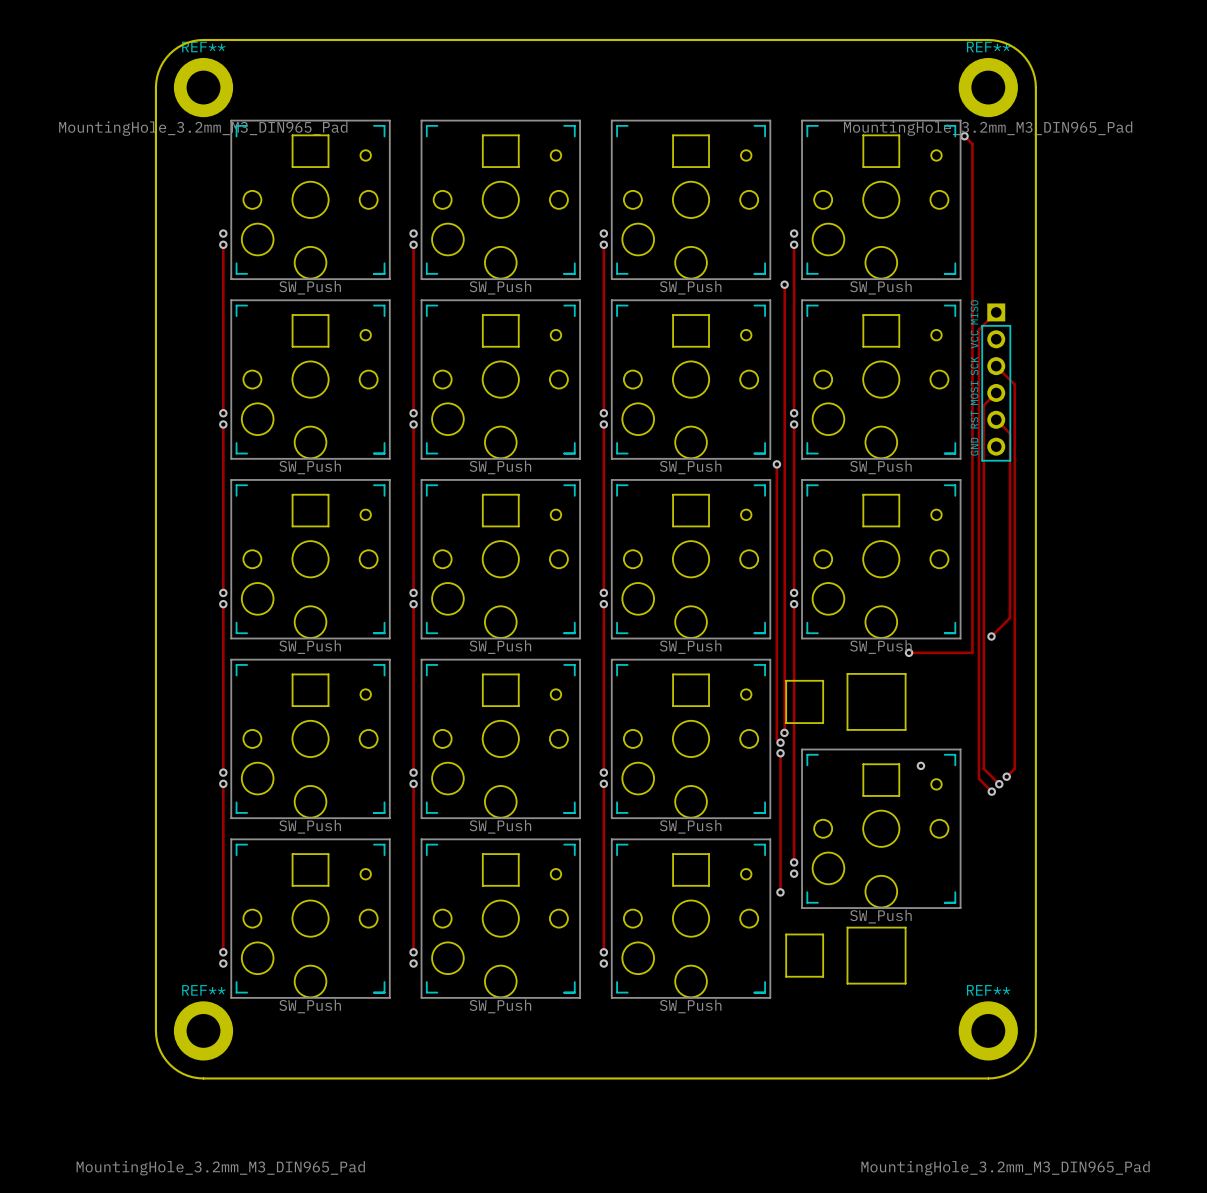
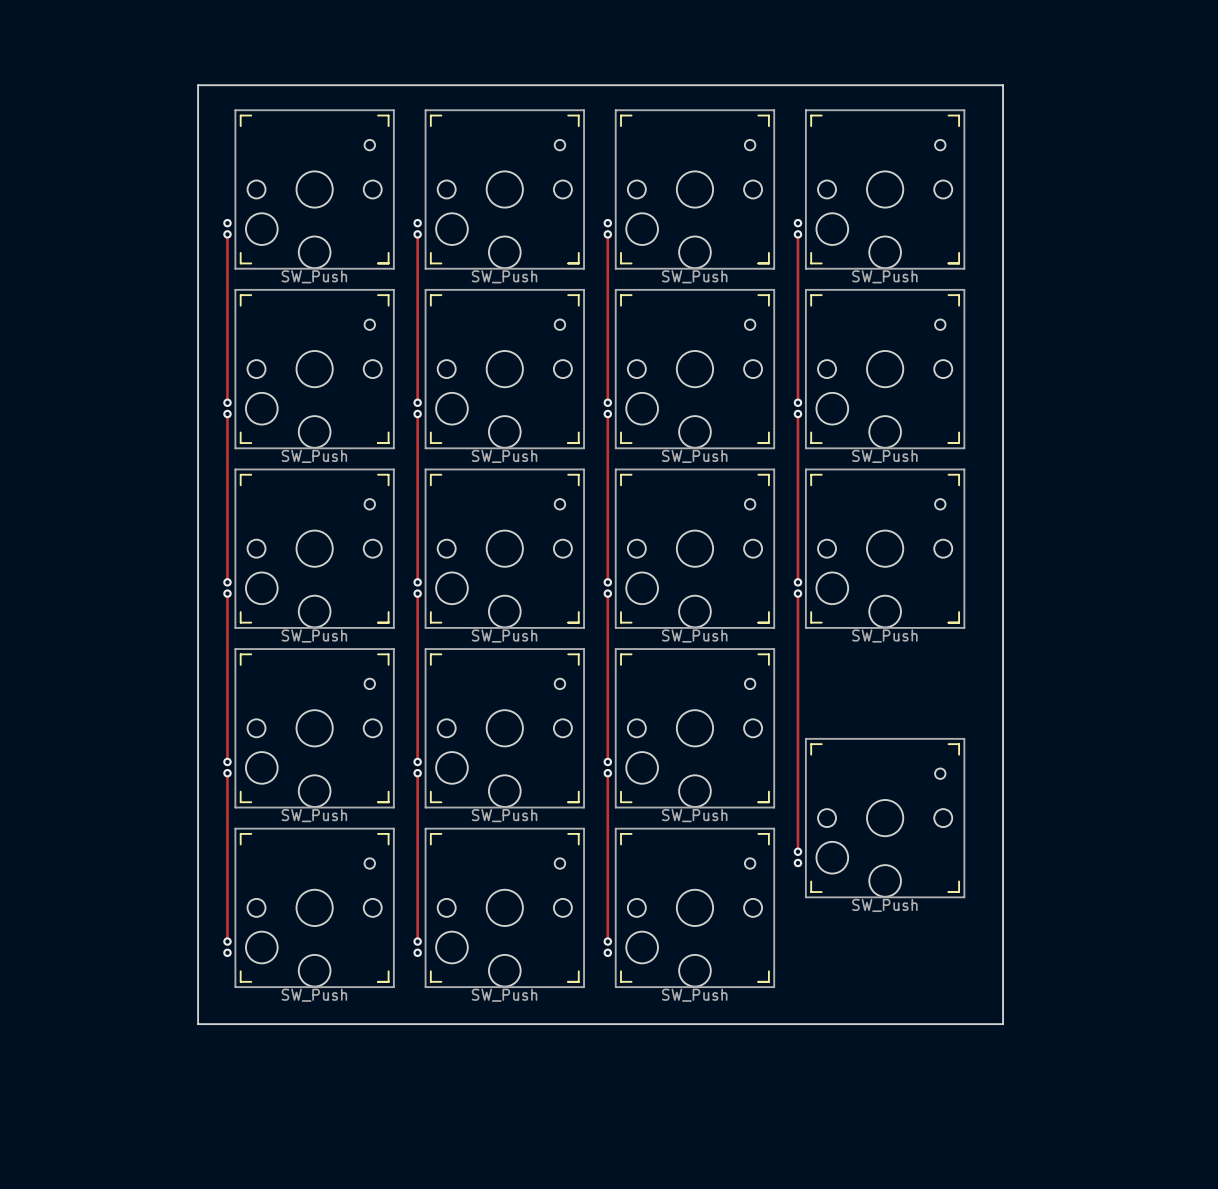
board edge: (203, 39) (988, 39) (1008, 44) (1025, 57) (1033, 71) (1035, 87) (1035, 1030) (1031, 1051) (1017, 1068) (1004, 1075) (988, 1078) (203, 1078) (182, 1073) (166, 1060) (158, 1046) (155, 1030) (155, 87) (158, 71) (169, 53) (187, 42) (203, 39) -> (198, 85) (198, 1024) (1003, 1024) (1003, 85) (198, 85)
REF**: MountingHole_3.2mm_M3_DIN965_Pad (203, 87) -> none
REF**: MountingHole_3.2mm_M3_DIN965_Pad (988, 87) -> none
track: (964, 136) (972, 144) (972, 652) (909, 652) -> none
via: (964, 136) -> none
part: (310, 151) -> none
part: (500, 151) -> none
part: (691, 151) -> none
part: (881, 151) -> none
track: (784, 284) (784, 732) -> none
via: (784, 284) -> none
track: (996, 312) (978, 329) (978, 778) (991, 791) -> none
part: (310, 330) -> none
part: (500, 330) -> none
part: (691, 330) -> none
part: (881, 330) -> none
track: (996, 366) (1014, 384) (1014, 768) (1006, 776) -> none
part: (996, 382) -> none
track: (996, 392) (983, 405) (983, 768) (999, 784) -> none
track: (996, 419) (1010, 433) (1010, 618) (991, 636) -> none
track: (776, 464) (776, 738) (780, 742) -> none
via: (776, 464) -> none
part: (310, 510) -> none
part: (500, 510) -> none
part: (691, 510) -> none
part: (881, 510) -> none
via: (991, 636) -> none
via: (909, 652) -> none
drawing: [785, 673, 907, 985] -> none
part: (310, 690) -> none
part: (500, 690) -> none
part: (691, 690) -> none
via: (784, 732) -> none
via: (780, 742) -> none
track: (780, 753) (780, 892) -> none
via: (780, 753) -> none
via: (920, 765) -> none
via: (1006, 776) -> none
part: (881, 780) -> none
via: (999, 784) -> none
via: (991, 791) -> none
part: (310, 869) -> none
part: (500, 869) -> none
part: (691, 869) -> none
via: (780, 892) -> none
REF**: MountingHole_3.2mm_M3_DIN965_Pad (203, 1030) -> none
REF**: MountingHole_3.2mm_M3_DIN965_Pad (988, 1030) -> none

